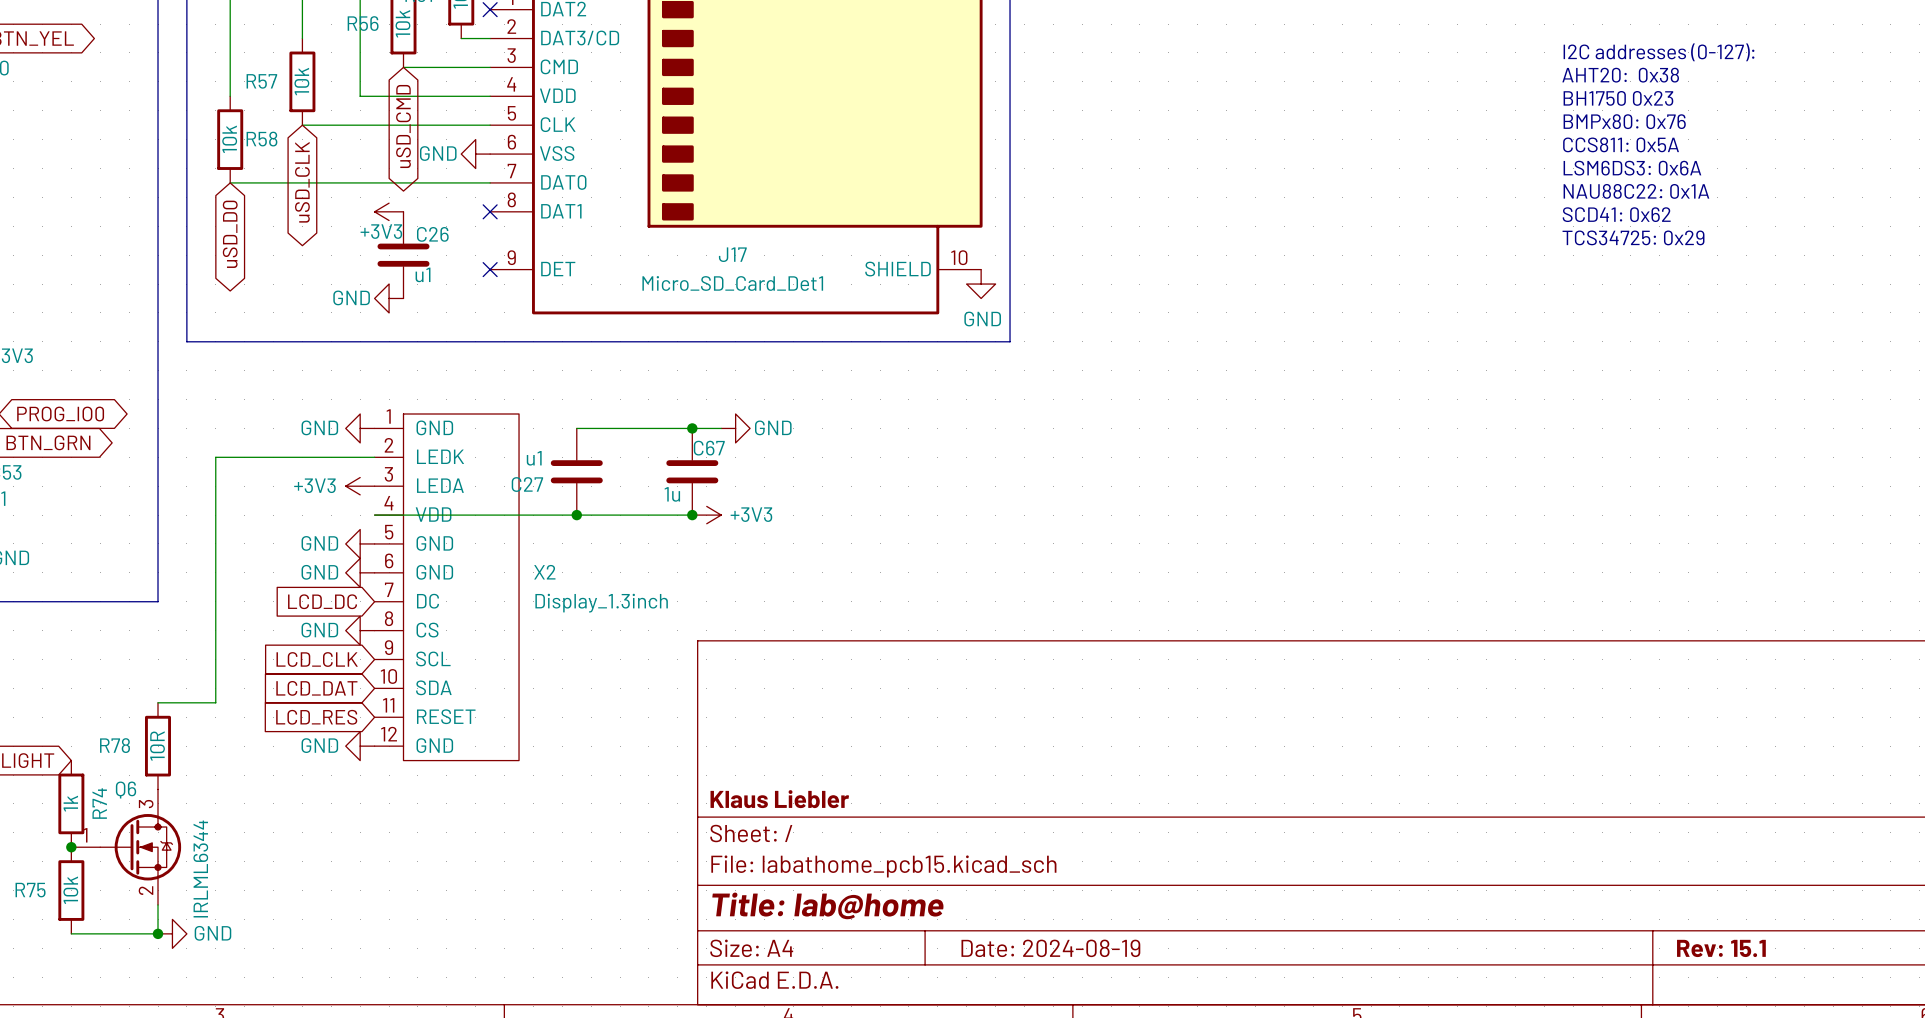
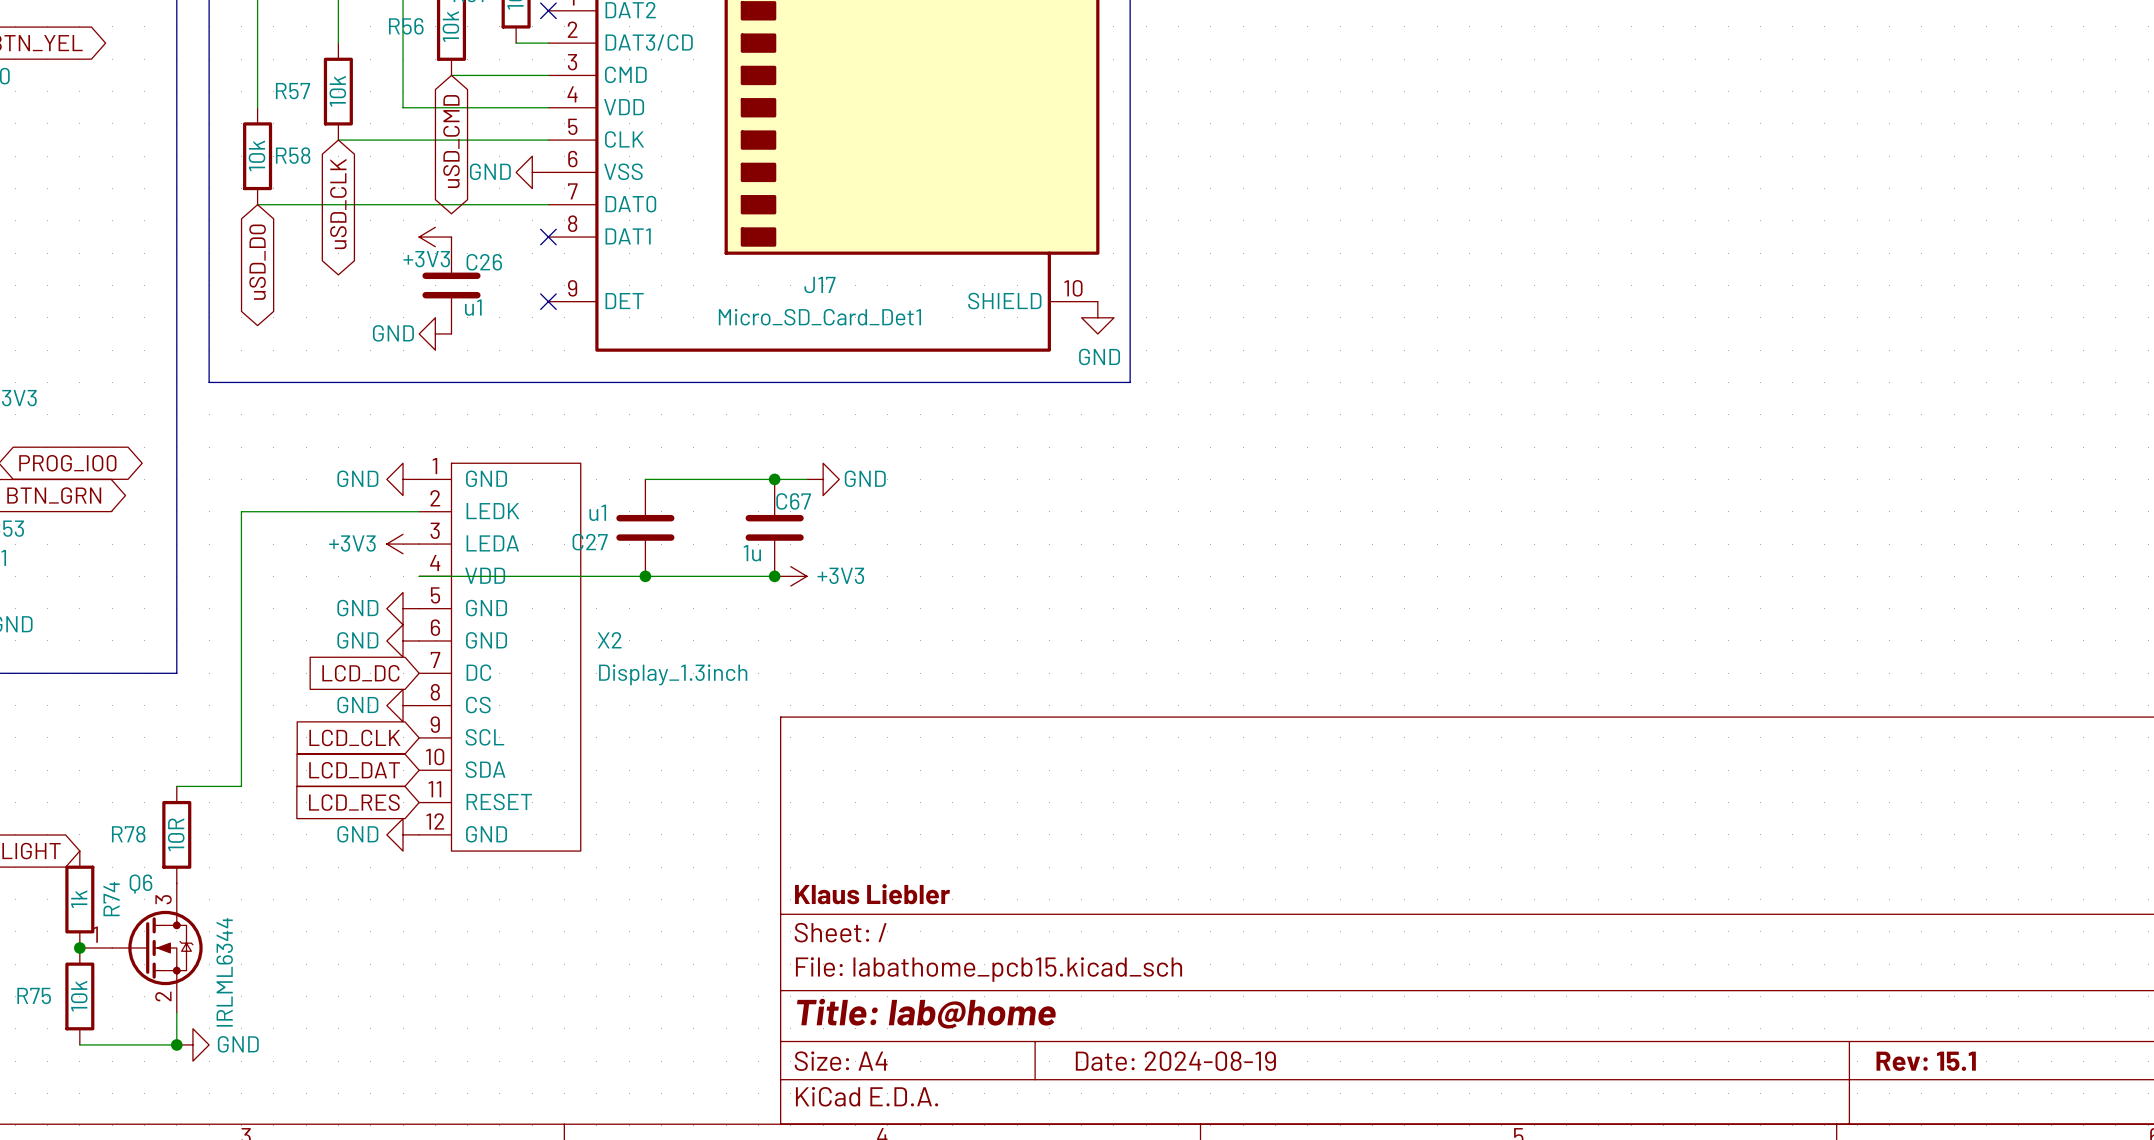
text: I2C addresses (0-127): (1658, 52) -> none
text: AHT20: 0x38 (1620, 75) -> none
text: BH1750 0x23 (1618, 98) -> none
text: BMPx80: 0x76 (1624, 121) -> none
text: CCS811: 0x5A (1621, 144) -> none
text: LSM6DS3: 0x6A (1632, 168) -> none
text: NAU88C22: 0x1A (1636, 191) -> none
text: SCD41: 0x62 (1616, 214) -> none
text: TCS34725: 0x29 (1633, 237) -> none

